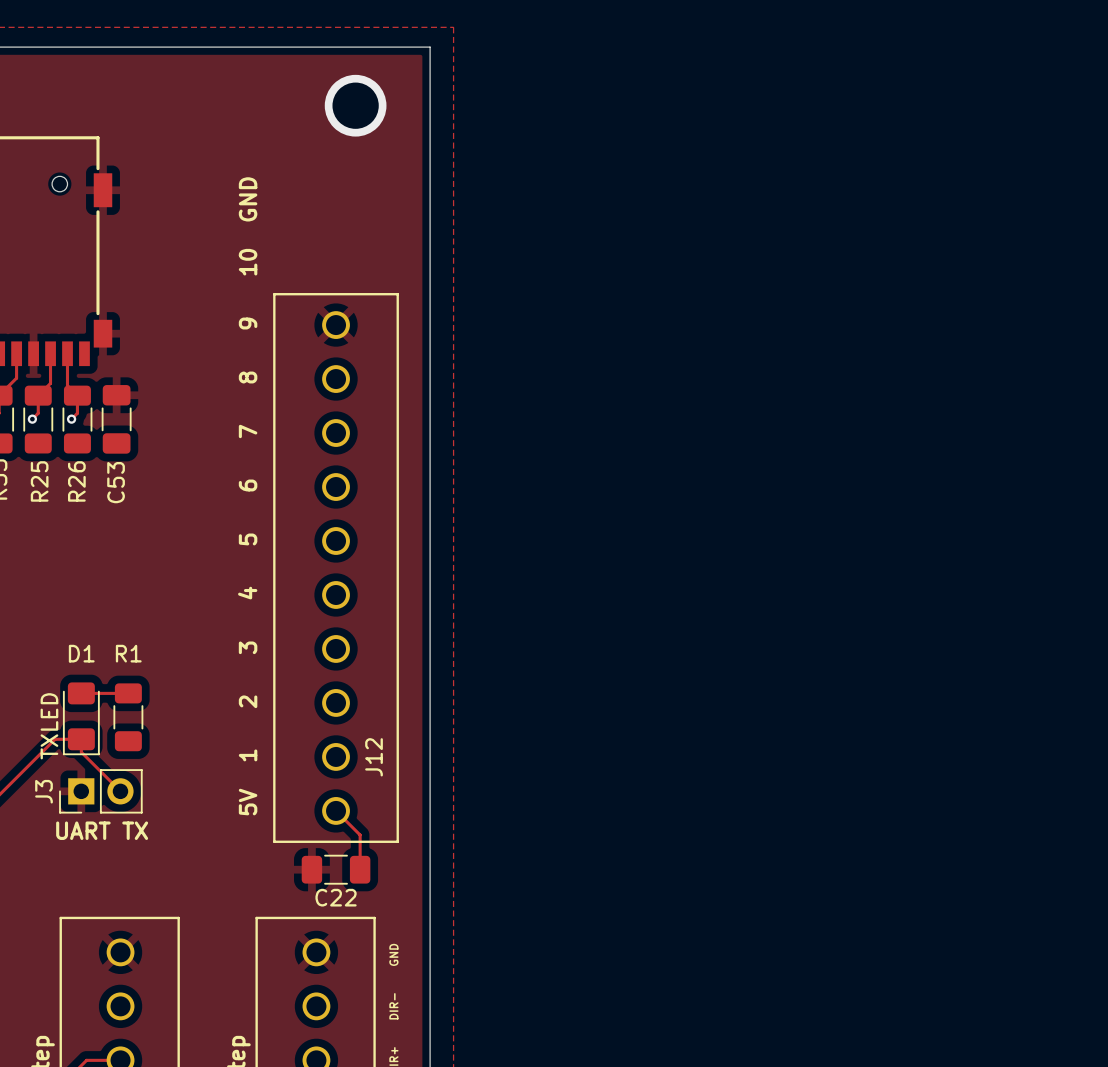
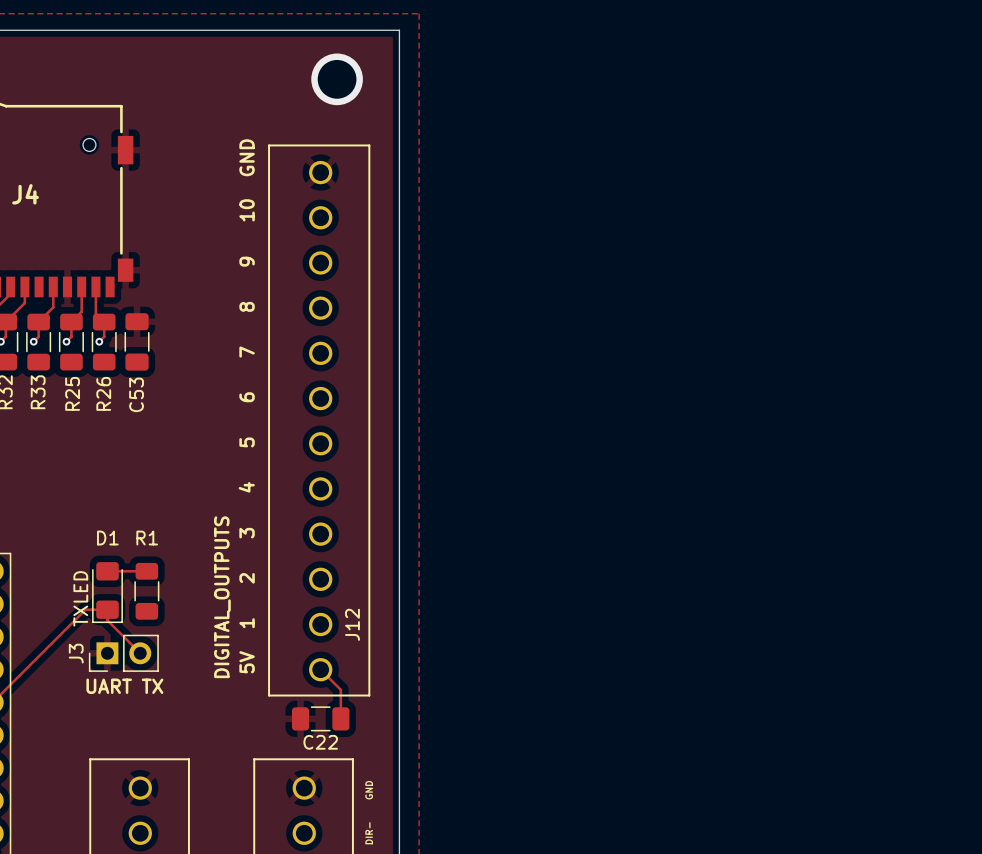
J12 footprint: [273, 293, 399, 843] -> [268, 144, 371, 697]
J12 value: none -> DIGITAL_OUTPUTS (222, 597)

